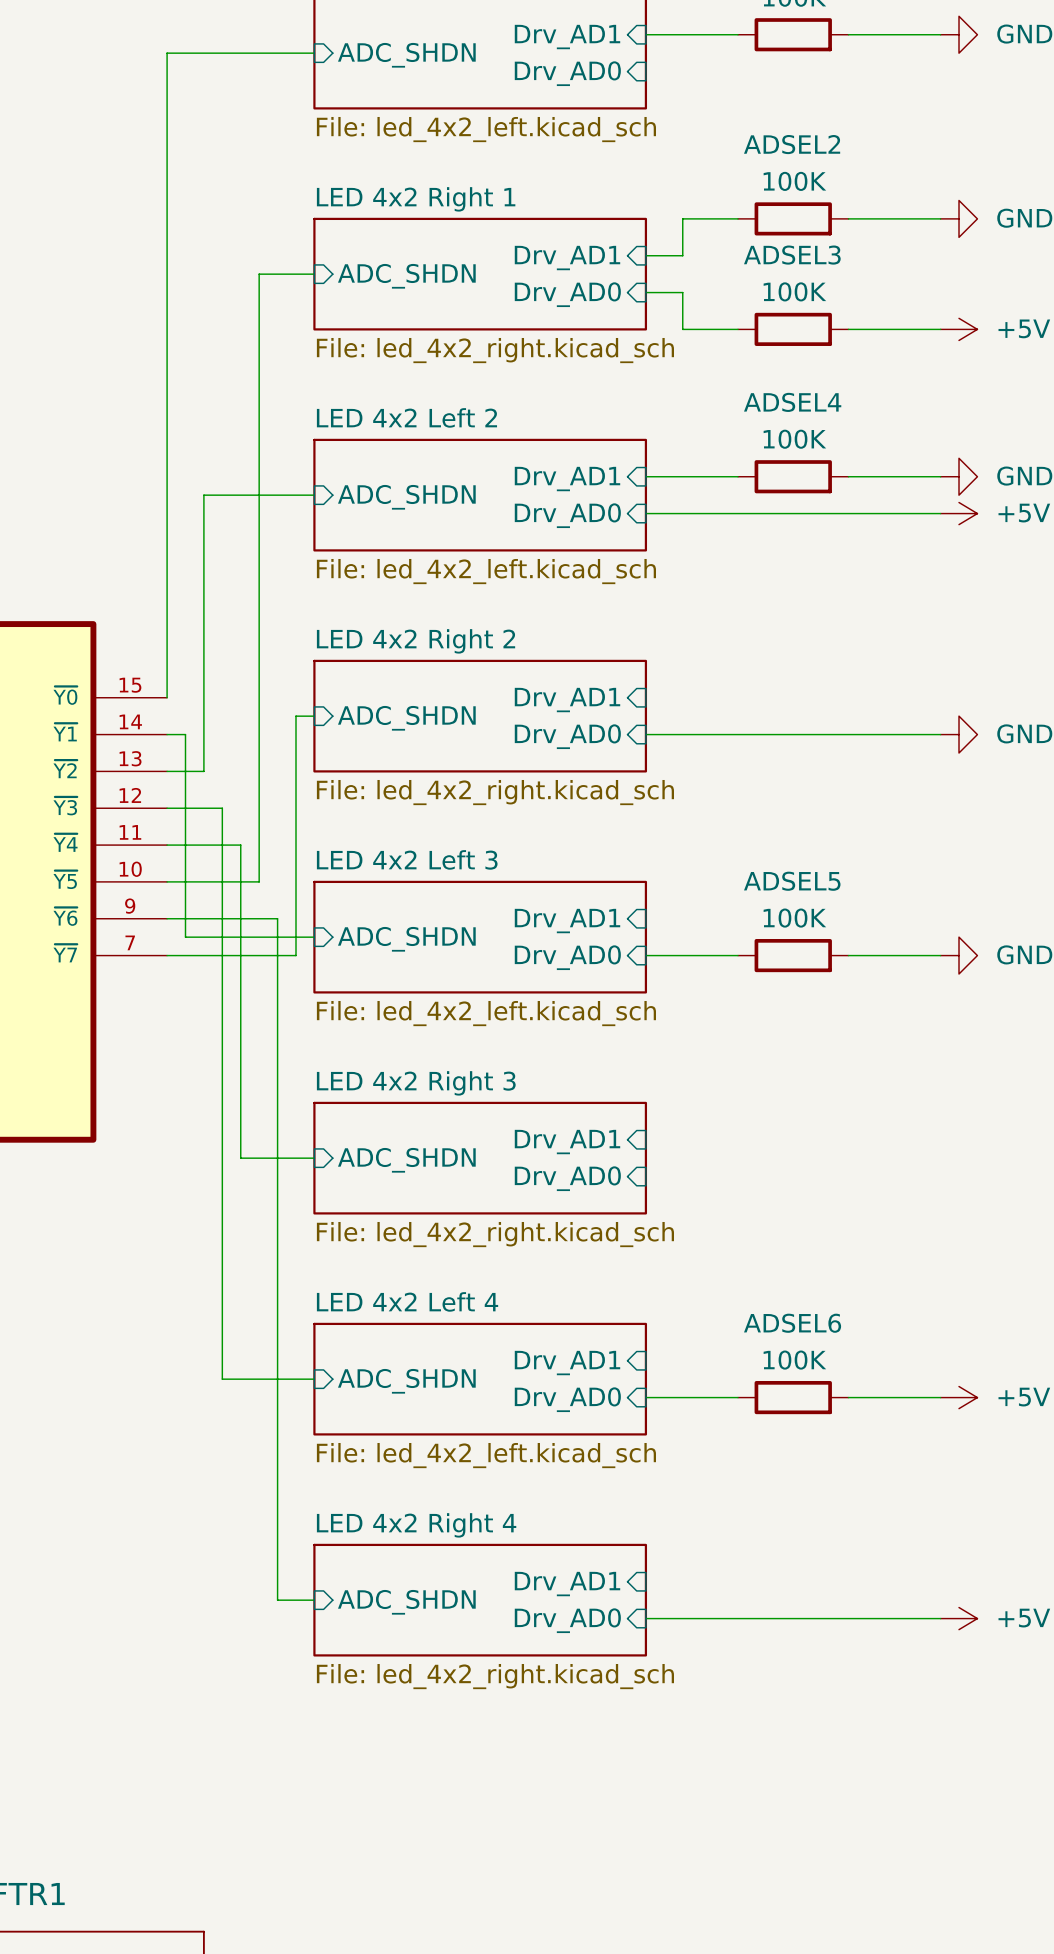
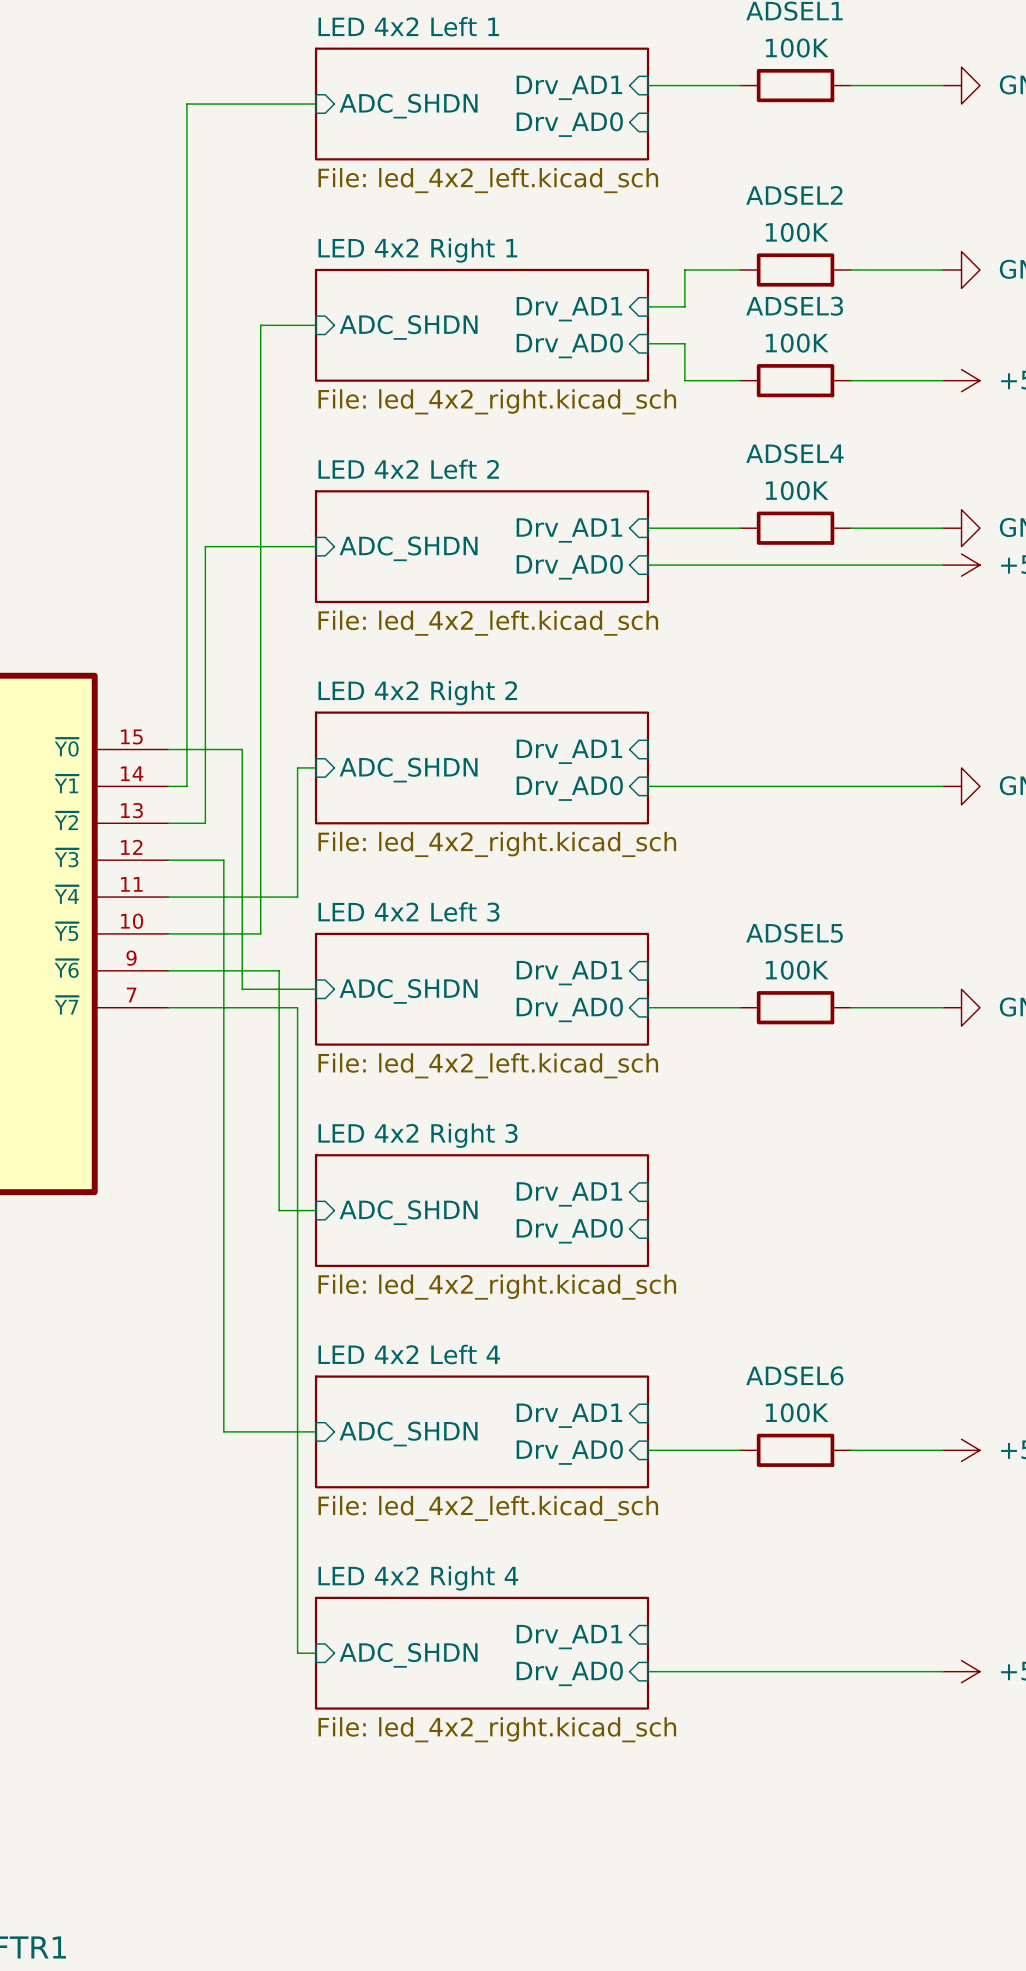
wire: (185, 53) (167, 53) (167, 697) -> (186, 104) (186, 786)
wire: (185, 734) (185, 937) (240, 937) (240, 1158) (277, 1158) (277, 1600) (296, 1600) -> (297, 1007) (297, 1653)
wire: (296, 845) (296, 955) -> (297, 897) (242, 897) (242, 749) (168, 749)

